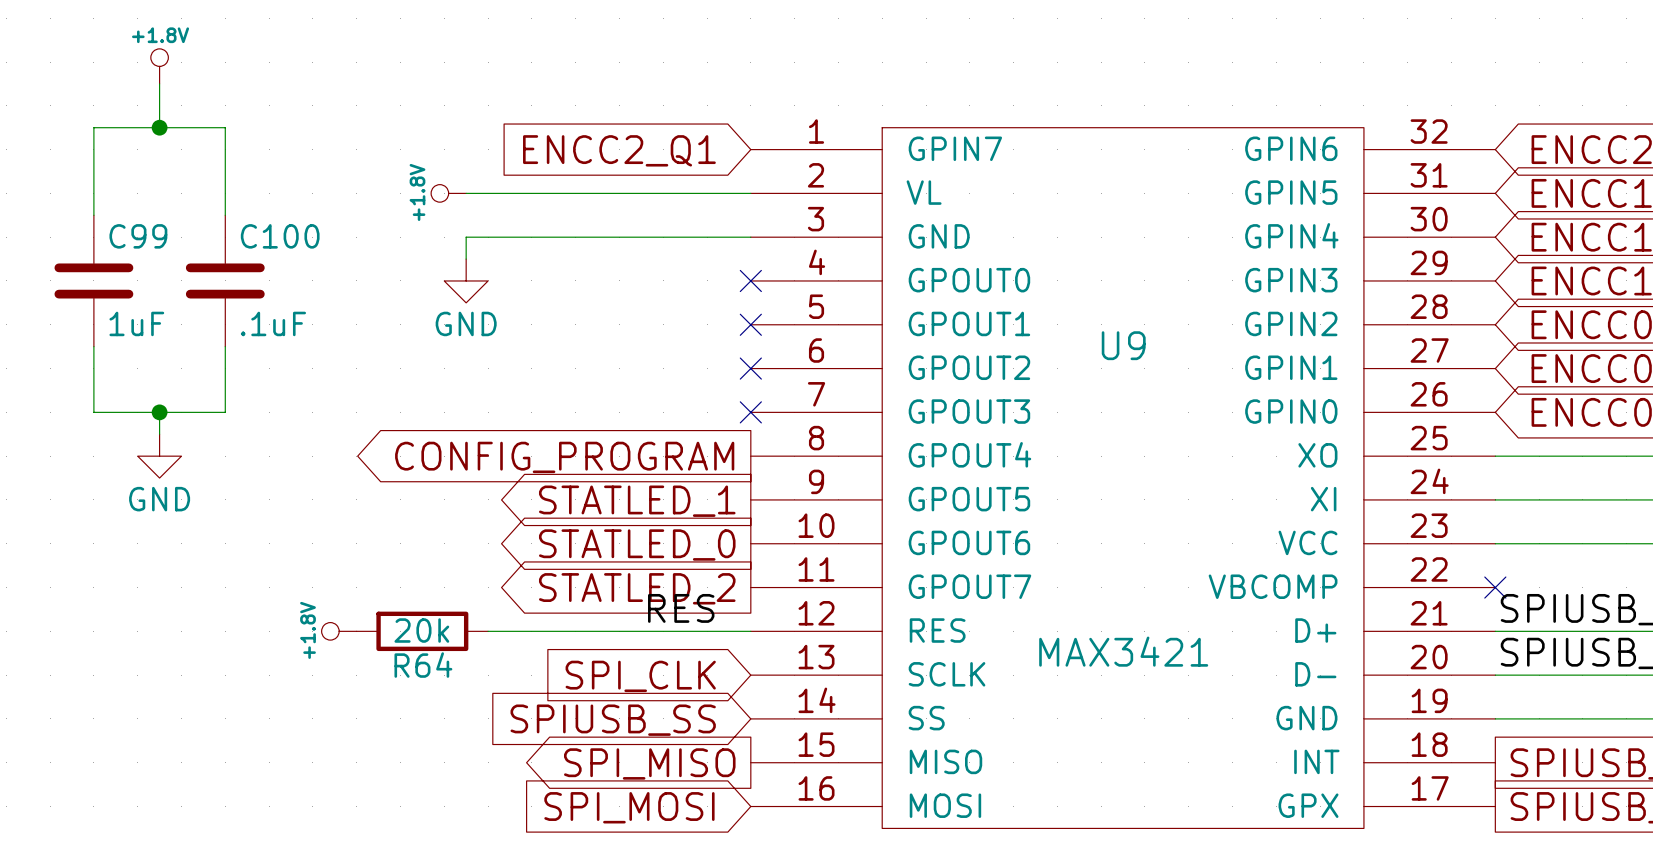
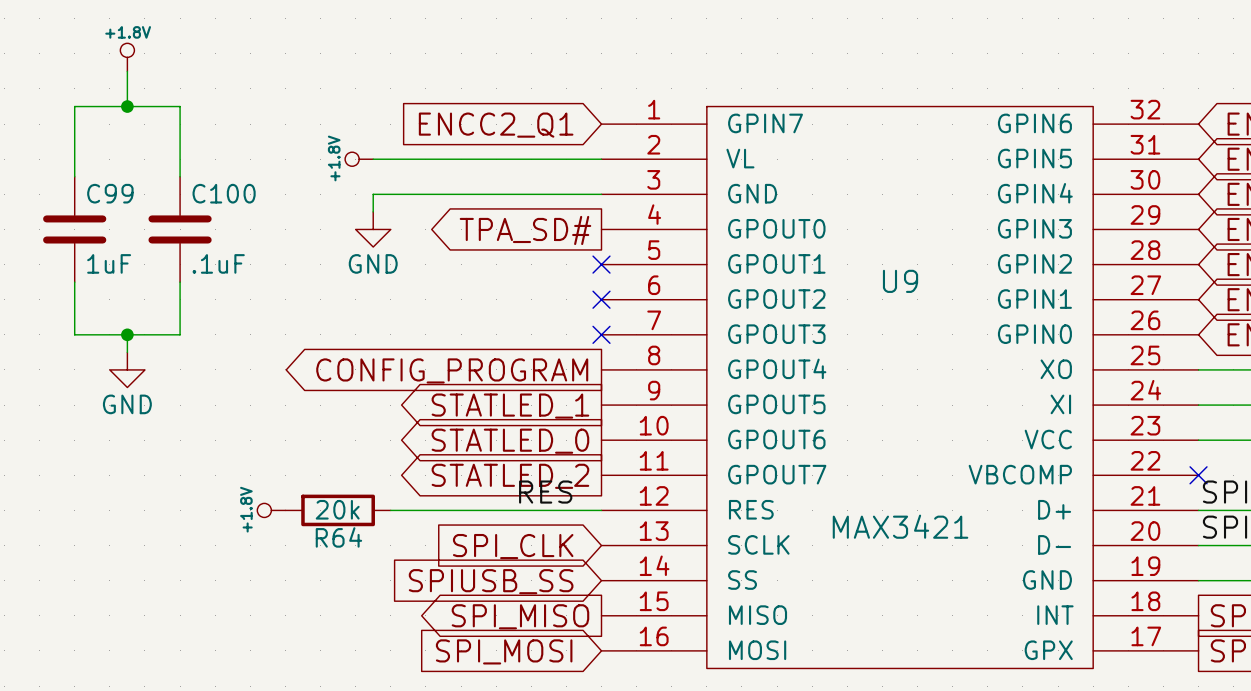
no-connect mark: (750, 280) -> none
global label: none -> TPA_SD# (525, 230)

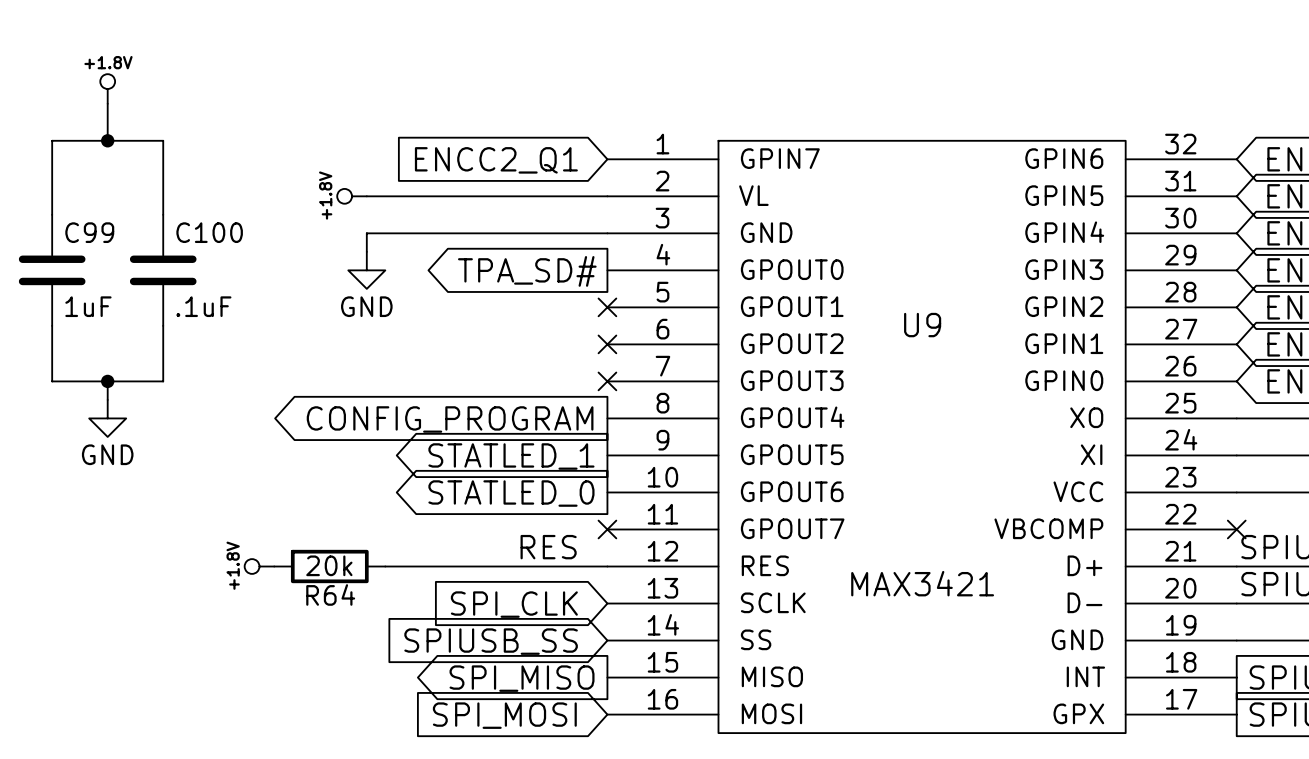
no-connect mark: none -> (607, 529)
global label: STATLED_2 (510, 476) -> none

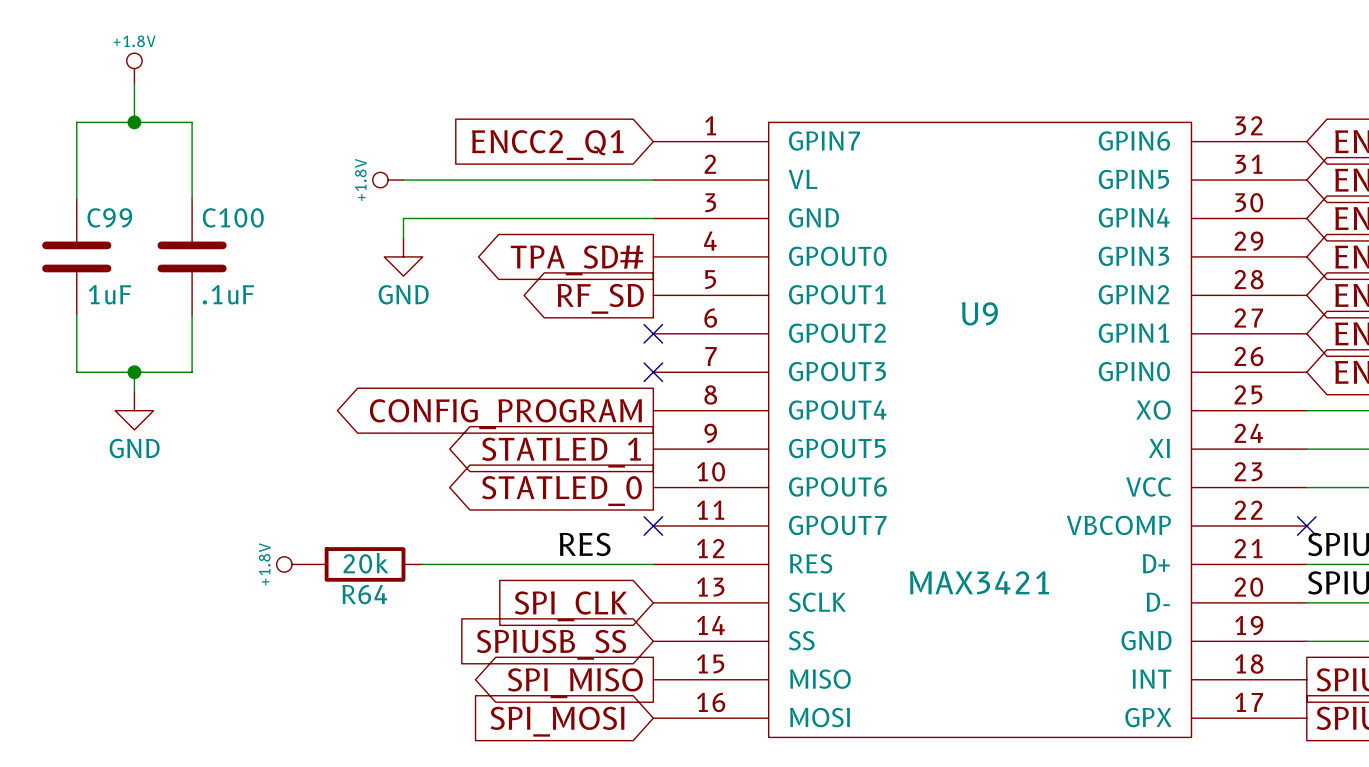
no-connect mark: (607, 307) -> none
global label: none -> RF_SD (600, 298)

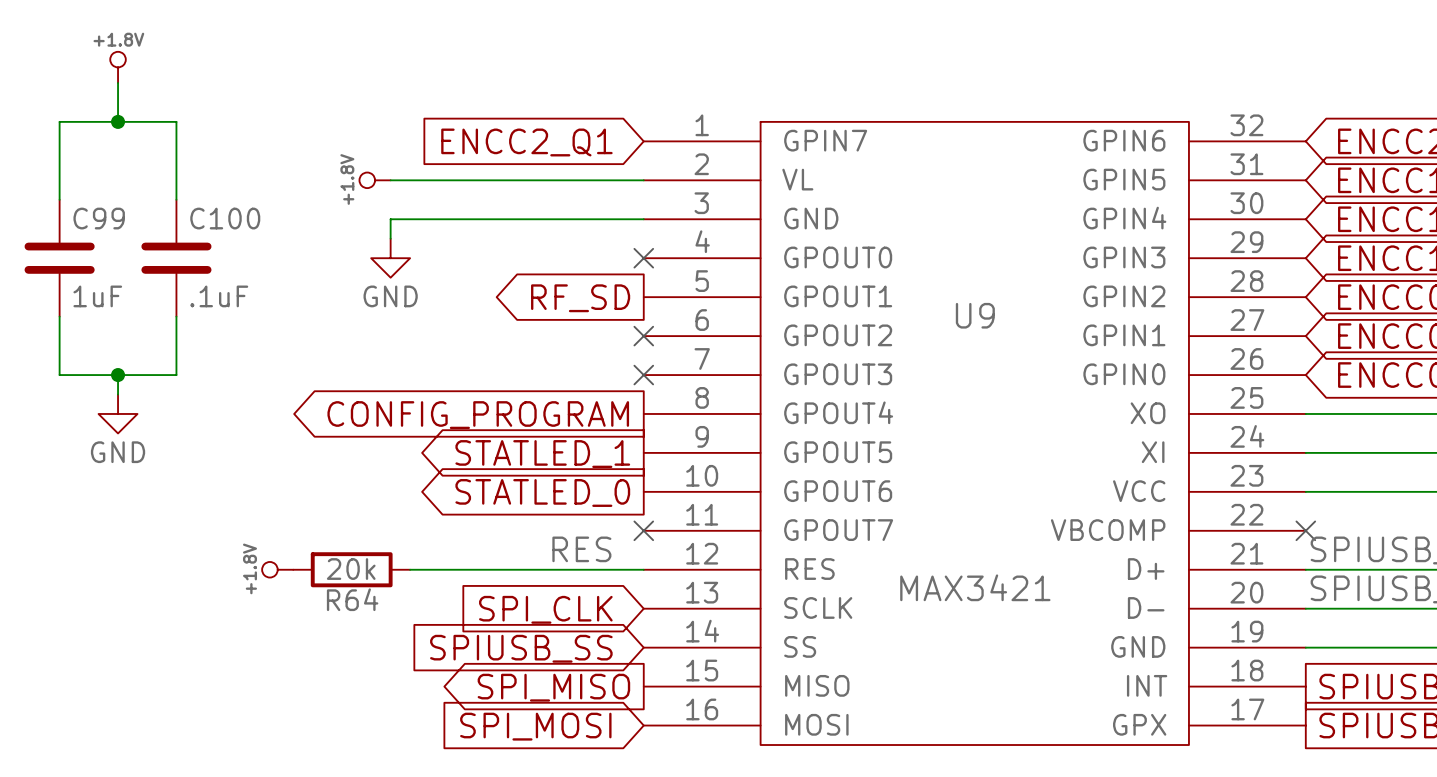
no-connect mark: none -> (643, 258)
global label: TPA_SD# (577, 260) -> none

